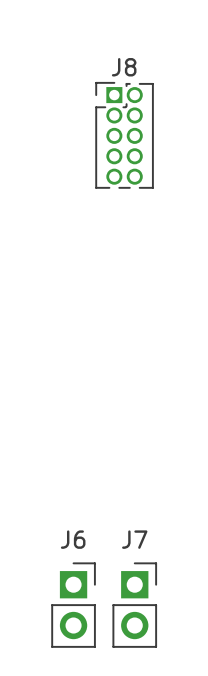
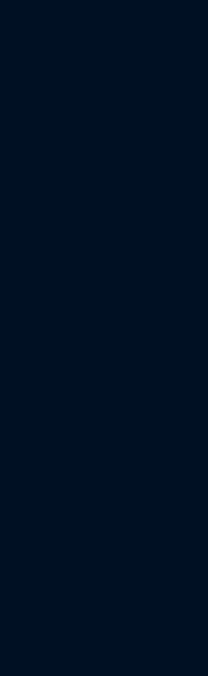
J8: (124, 135) -> none
J6: (73, 605) -> none
J7: (134, 605) -> none

